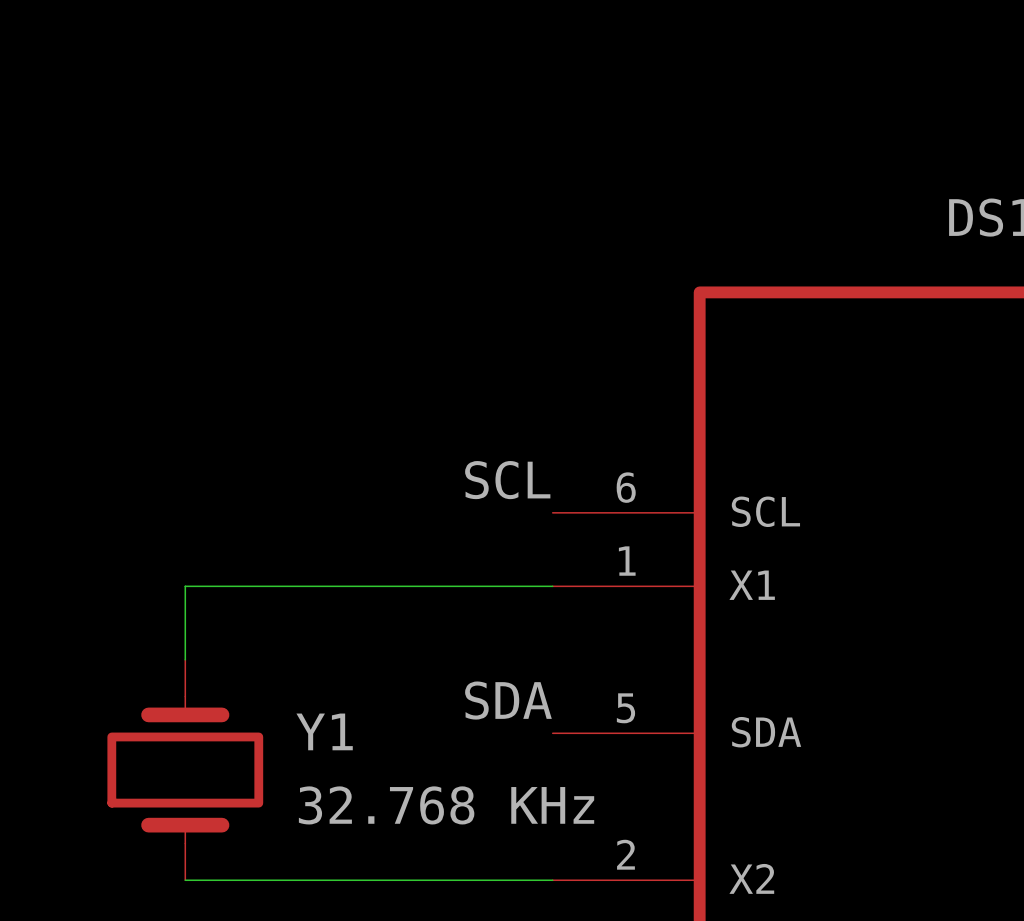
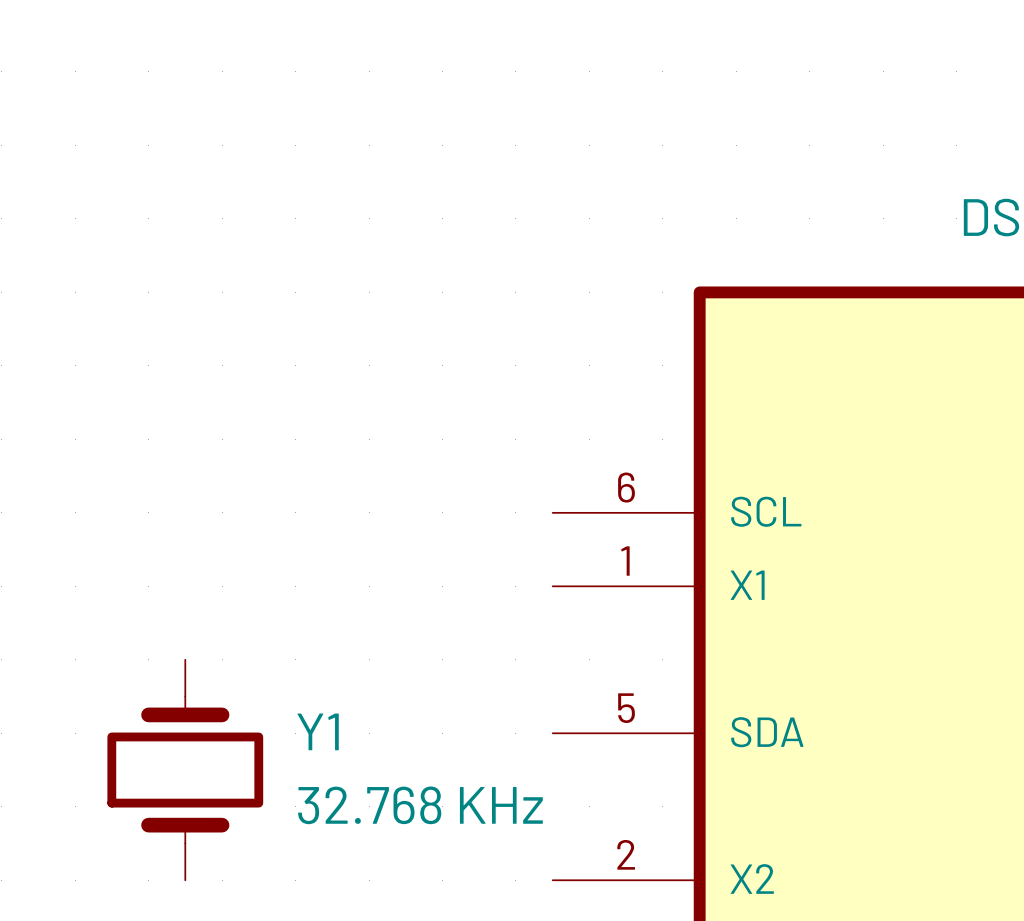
label: SCL (507, 480) -> none
wire: (552, 586) (185, 586) (185, 659) -> none
label: SDA (508, 700) -> none
wire: (185, 880) (552, 880) -> none

